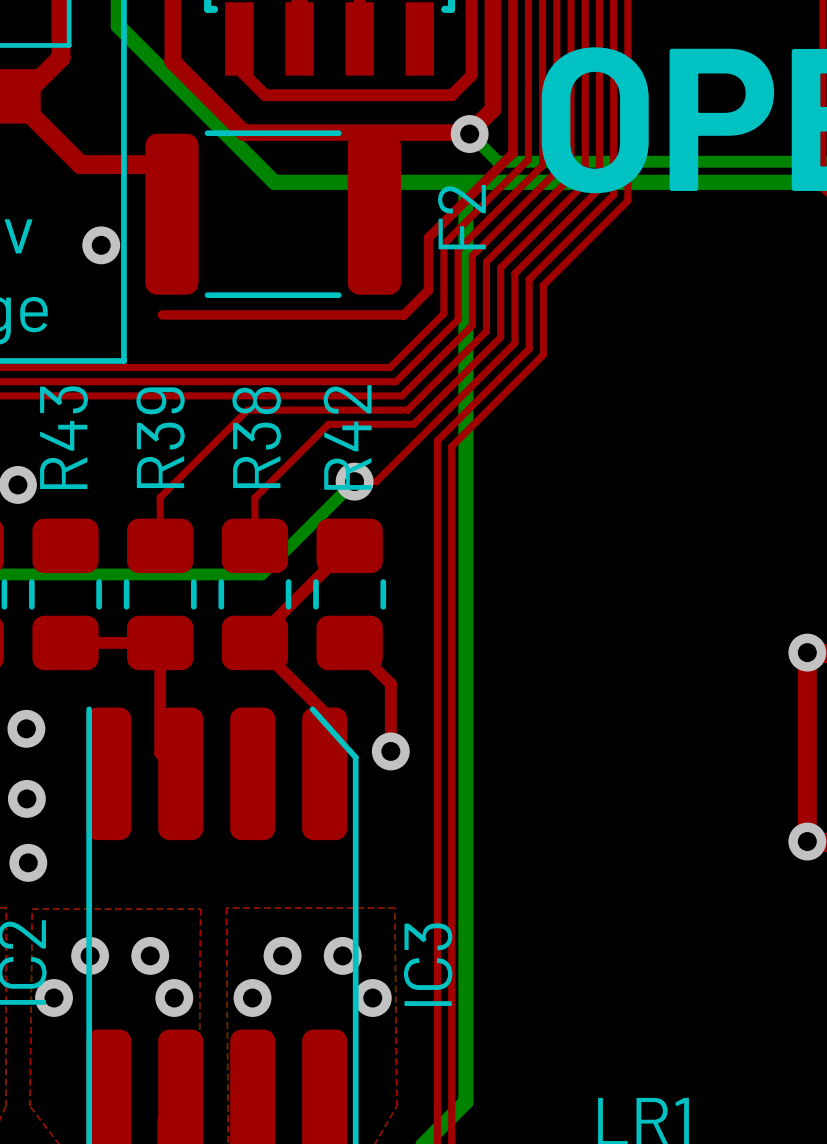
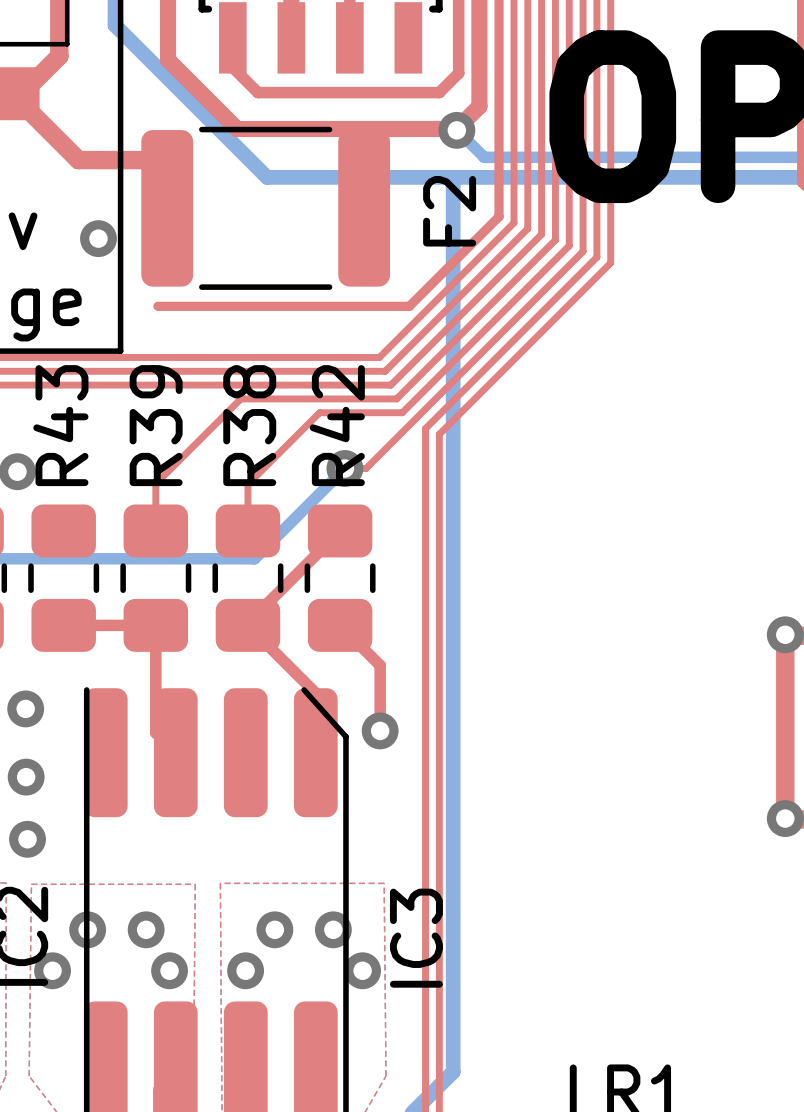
top track: (513, 153) (428, 237) (428, 290) (403, 314) -> (499, 149) (499, 216) (409, 306) (392, 306)
top track: (528, 159) (443, 244) (443, 313) -> (513, 155) (513, 222) (431, 305)
top track: (542, 165) (458, 250) (458, 319) -> (527, 160) (527, 228) (445, 310)
top track: (556, 171) (472, 255) (472, 325) -> (541, 166) (541, 234) (459, 316)
top track: (571, 177) (486, 261) (486, 331) -> (555, 172) (555, 240) (473, 322)
top track: (585, 183) (500, 267) (500, 337) -> (569, 178) (569, 245) (487, 328)
top track: (599, 189) (514, 273) (514, 343) -> (583, 183) (583, 251) (500, 333)
top track: (613, 194) (529, 279) (529, 349) -> (596, 189) (596, 257) (514, 339)
top track: (627, 200) (543, 285) (543, 354) -> (610, 195) (610, 262) (528, 345)

